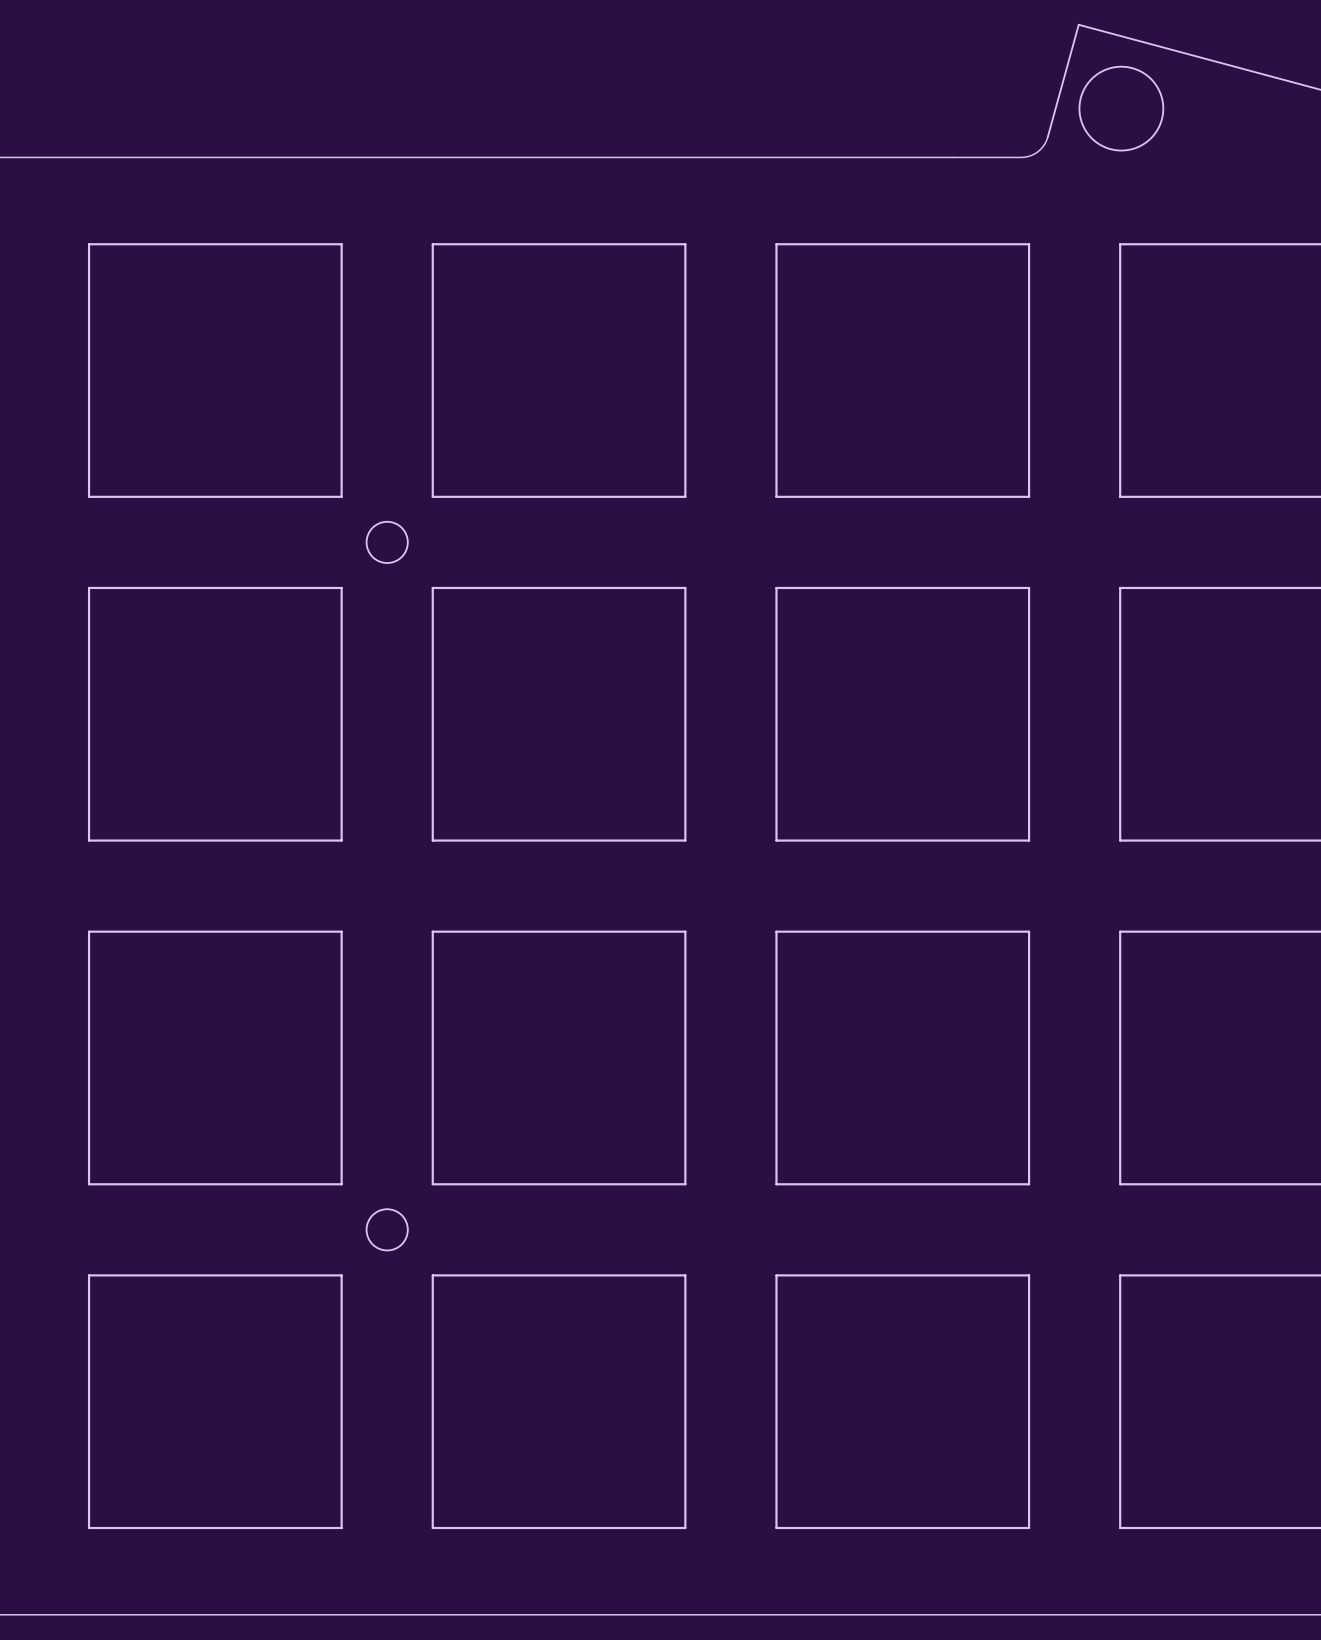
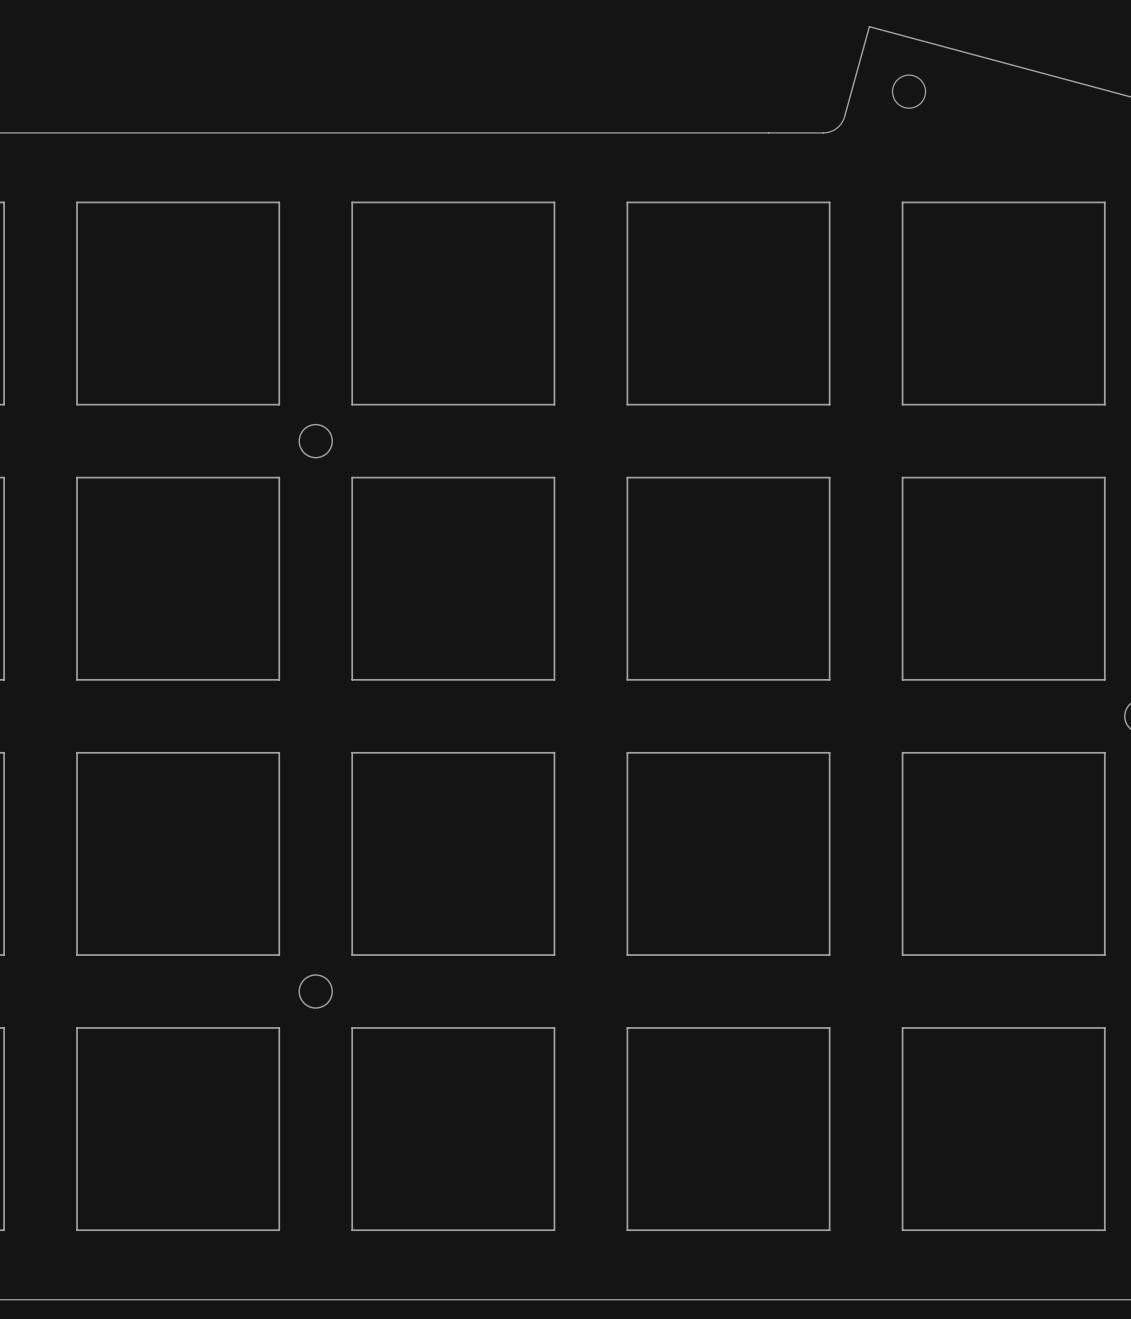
round board edge size: [1078, 65, 1165, 152] -> [892, 74, 926, 109]

